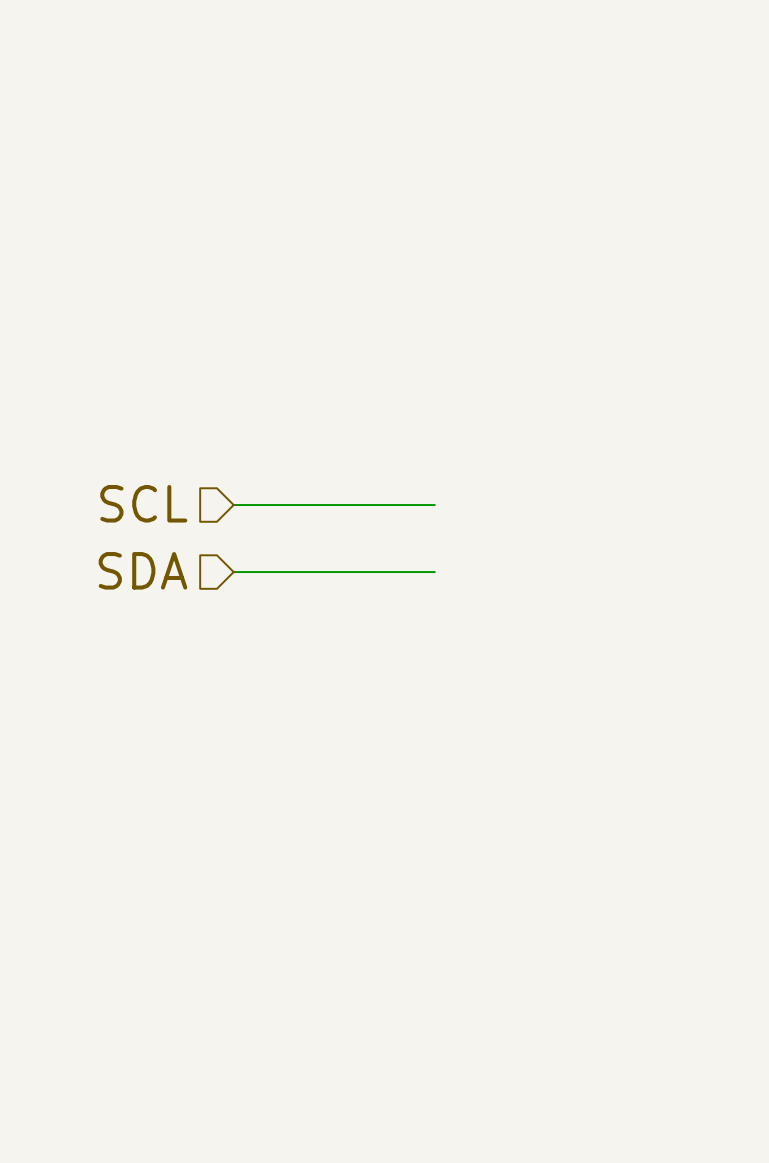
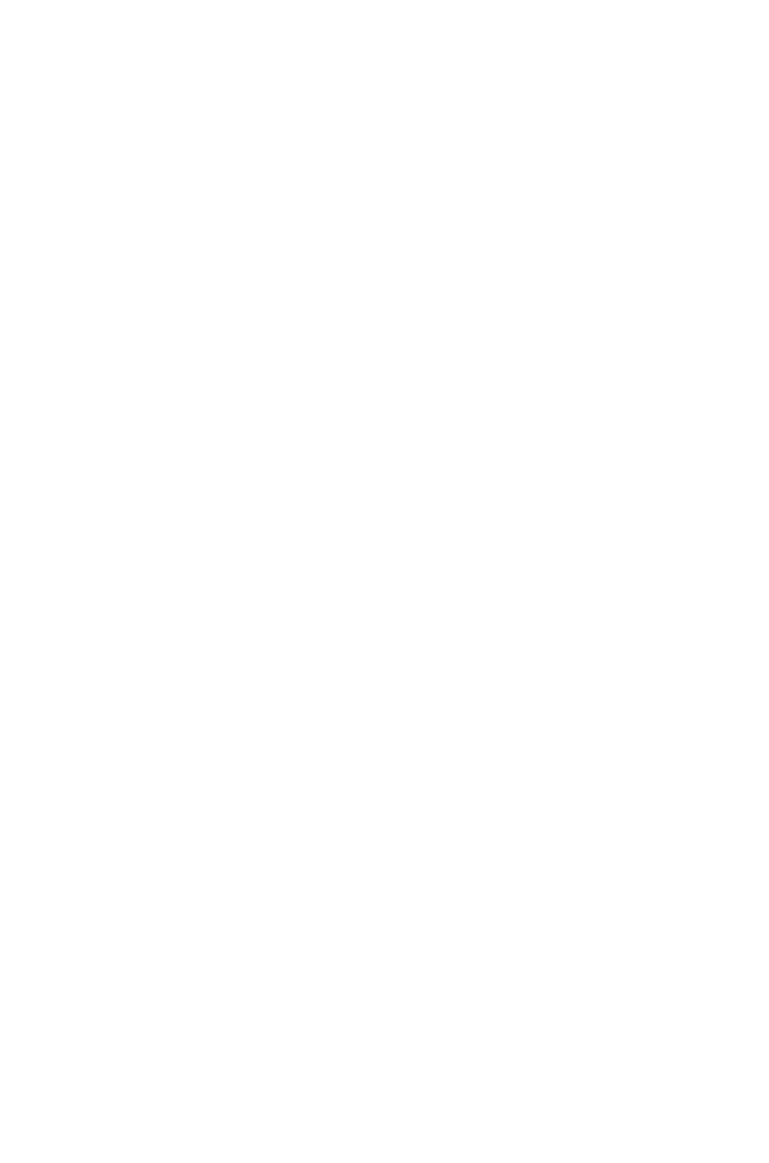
hierarchical label: SCL (143, 503) -> none
wire: (233, 505) (434, 505) -> none
hierarchical label: SDA (142, 570) -> none
wire: (233, 572) (434, 572) -> none

